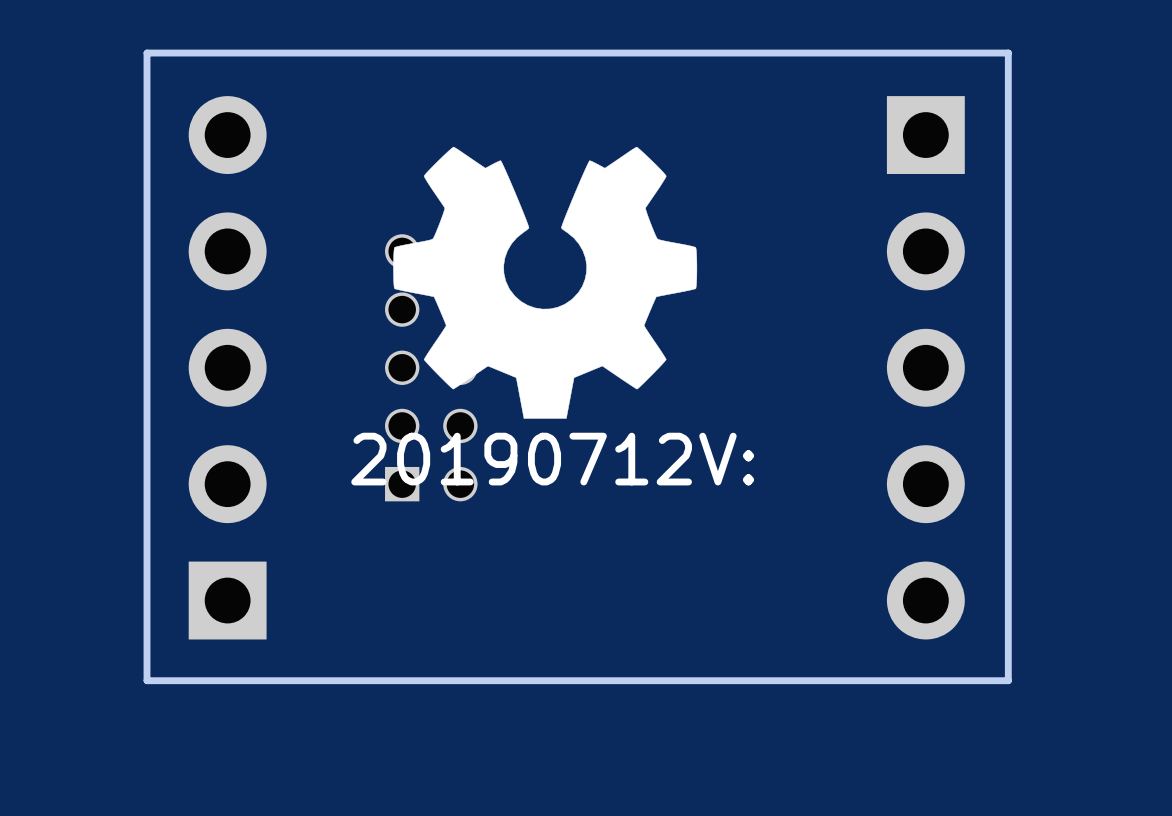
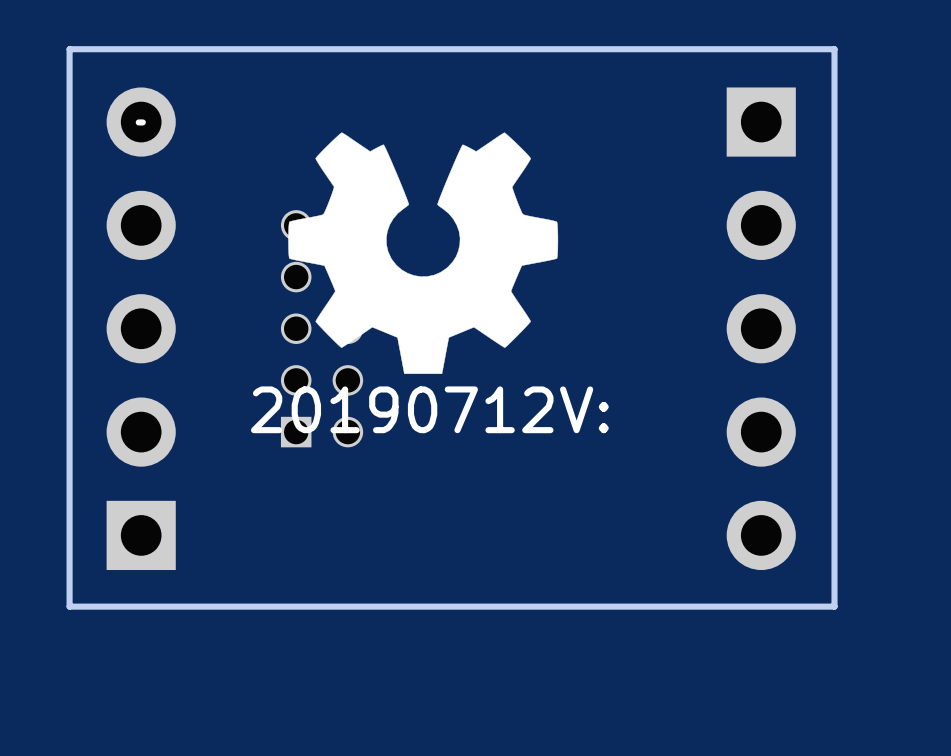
line: none -> (142, 122) (138, 122)

